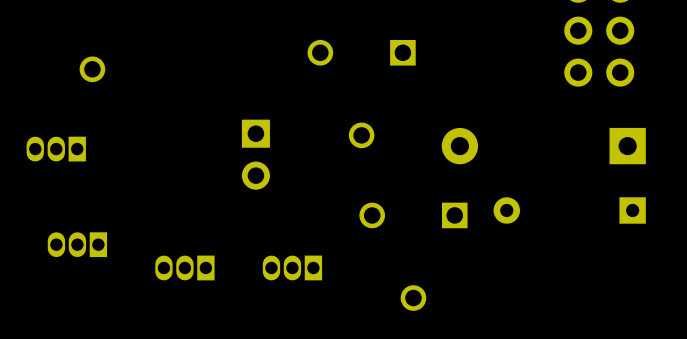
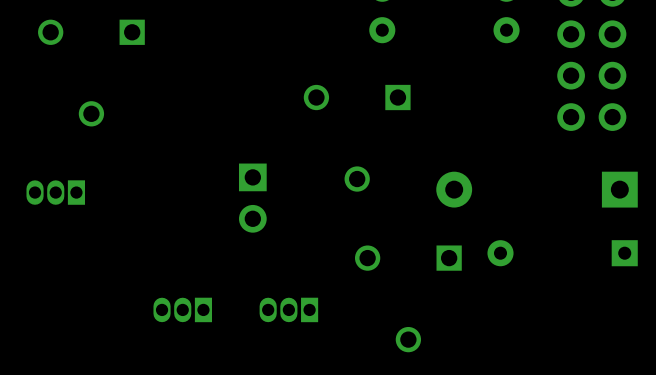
part: (77, 244) -> none

